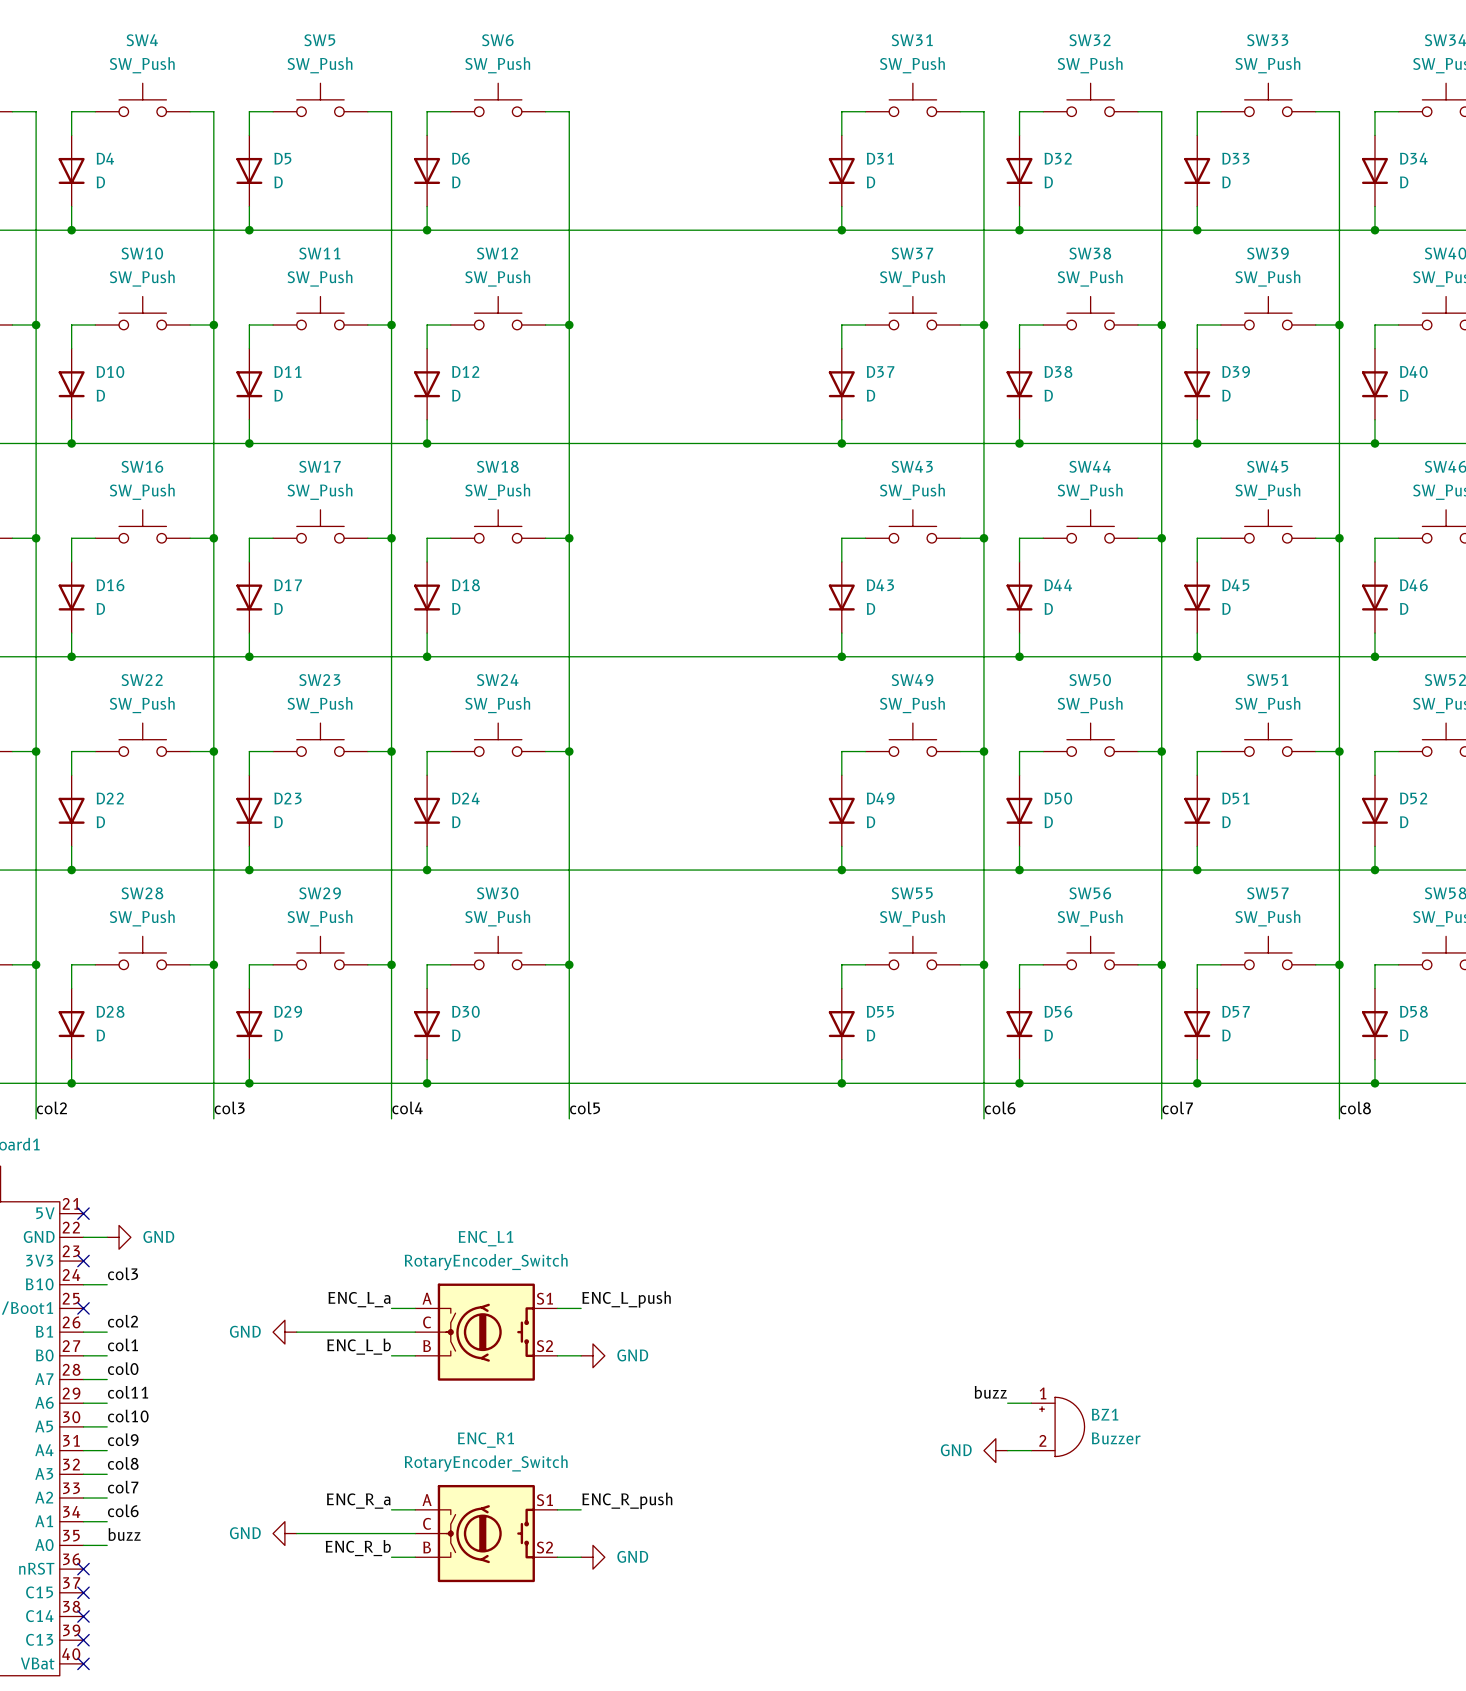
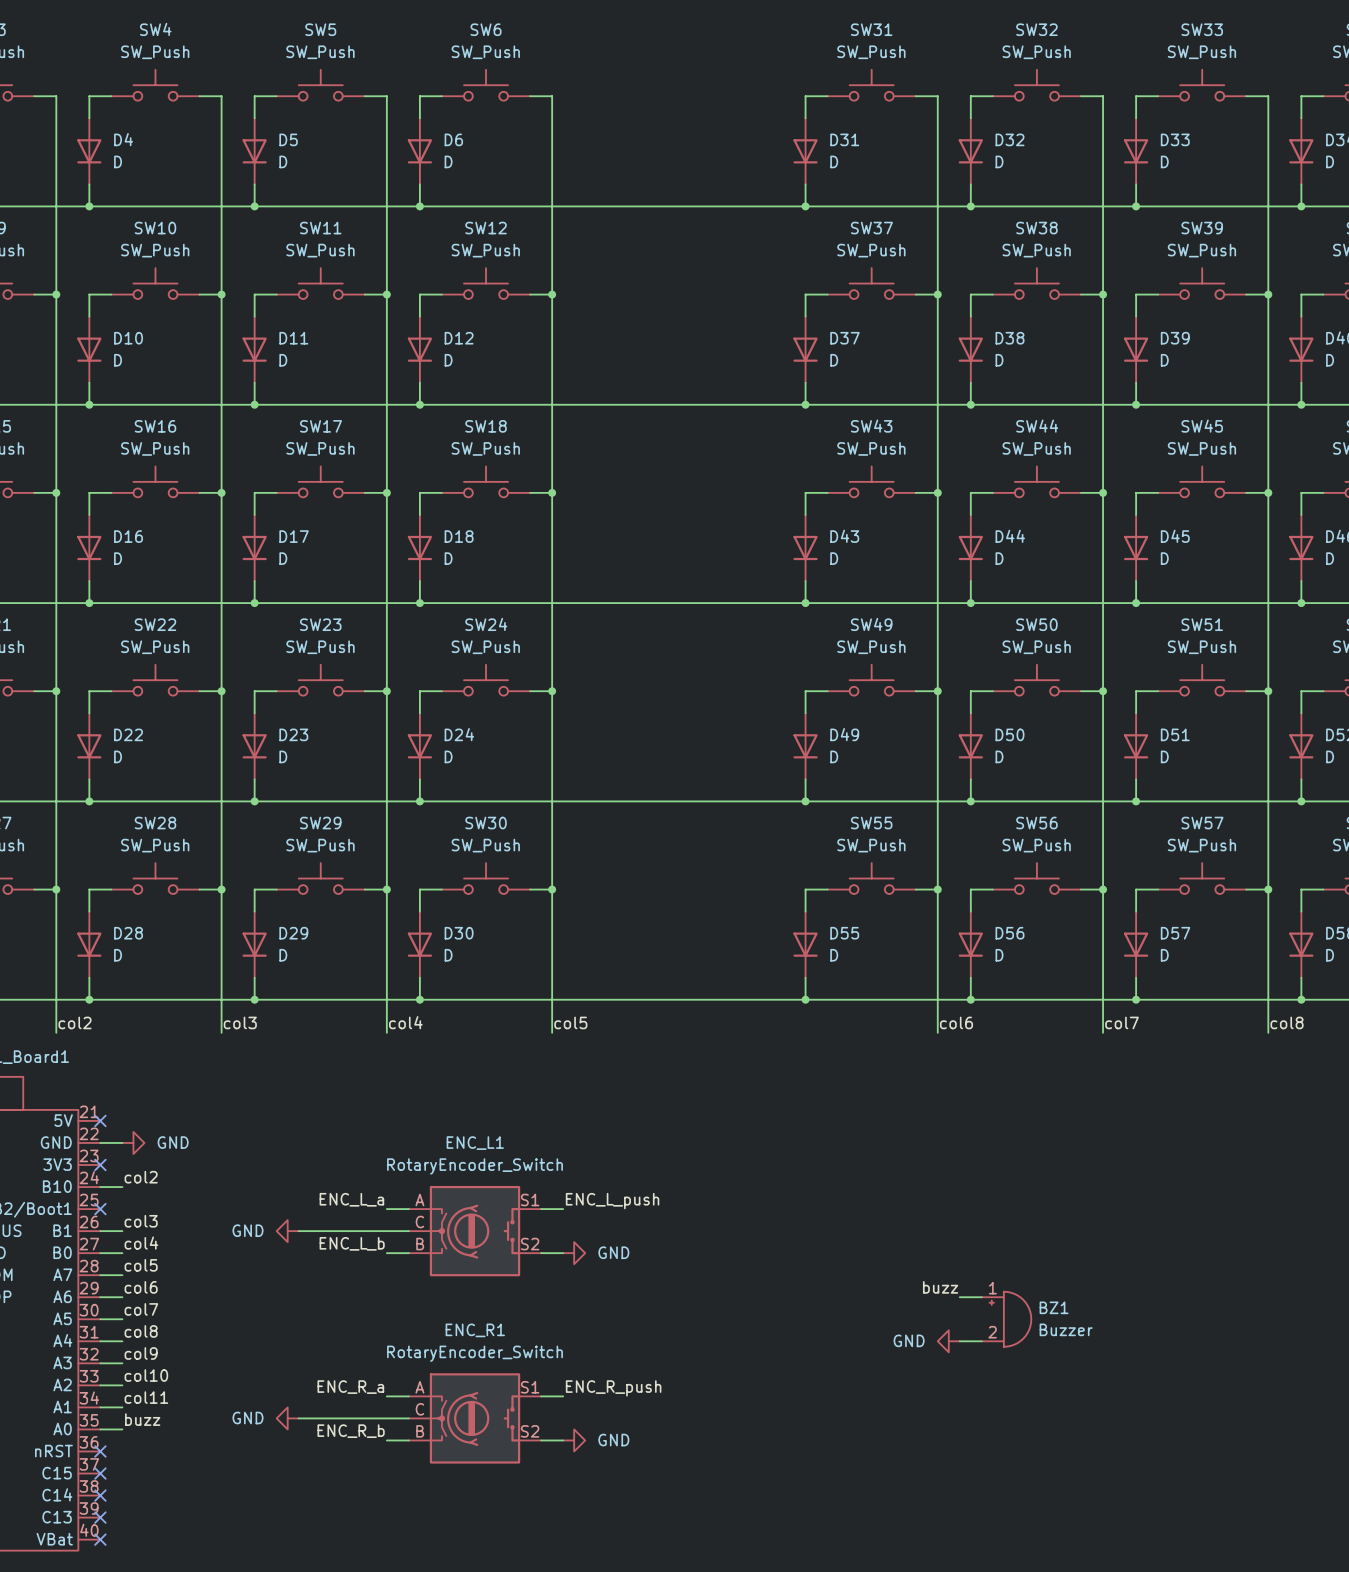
label: col3 (123, 1273) -> col2 (141, 1177)
label: col2 (122, 1321) -> col3 (141, 1221)
label: col1 (122, 1344) -> col4 (141, 1243)
label: col0 (123, 1368) -> col5 (141, 1265)
label: col11 (128, 1392) -> col6 (141, 1287)
label: col10 (128, 1416) -> col7 (141, 1309)
label: col9 (123, 1439) -> col8 (141, 1331)
label: col8 (123, 1463) -> col9 (141, 1353)
label: col7 (123, 1487) -> col10 (146, 1375)
label: col6 (123, 1510) -> col11 (146, 1397)

